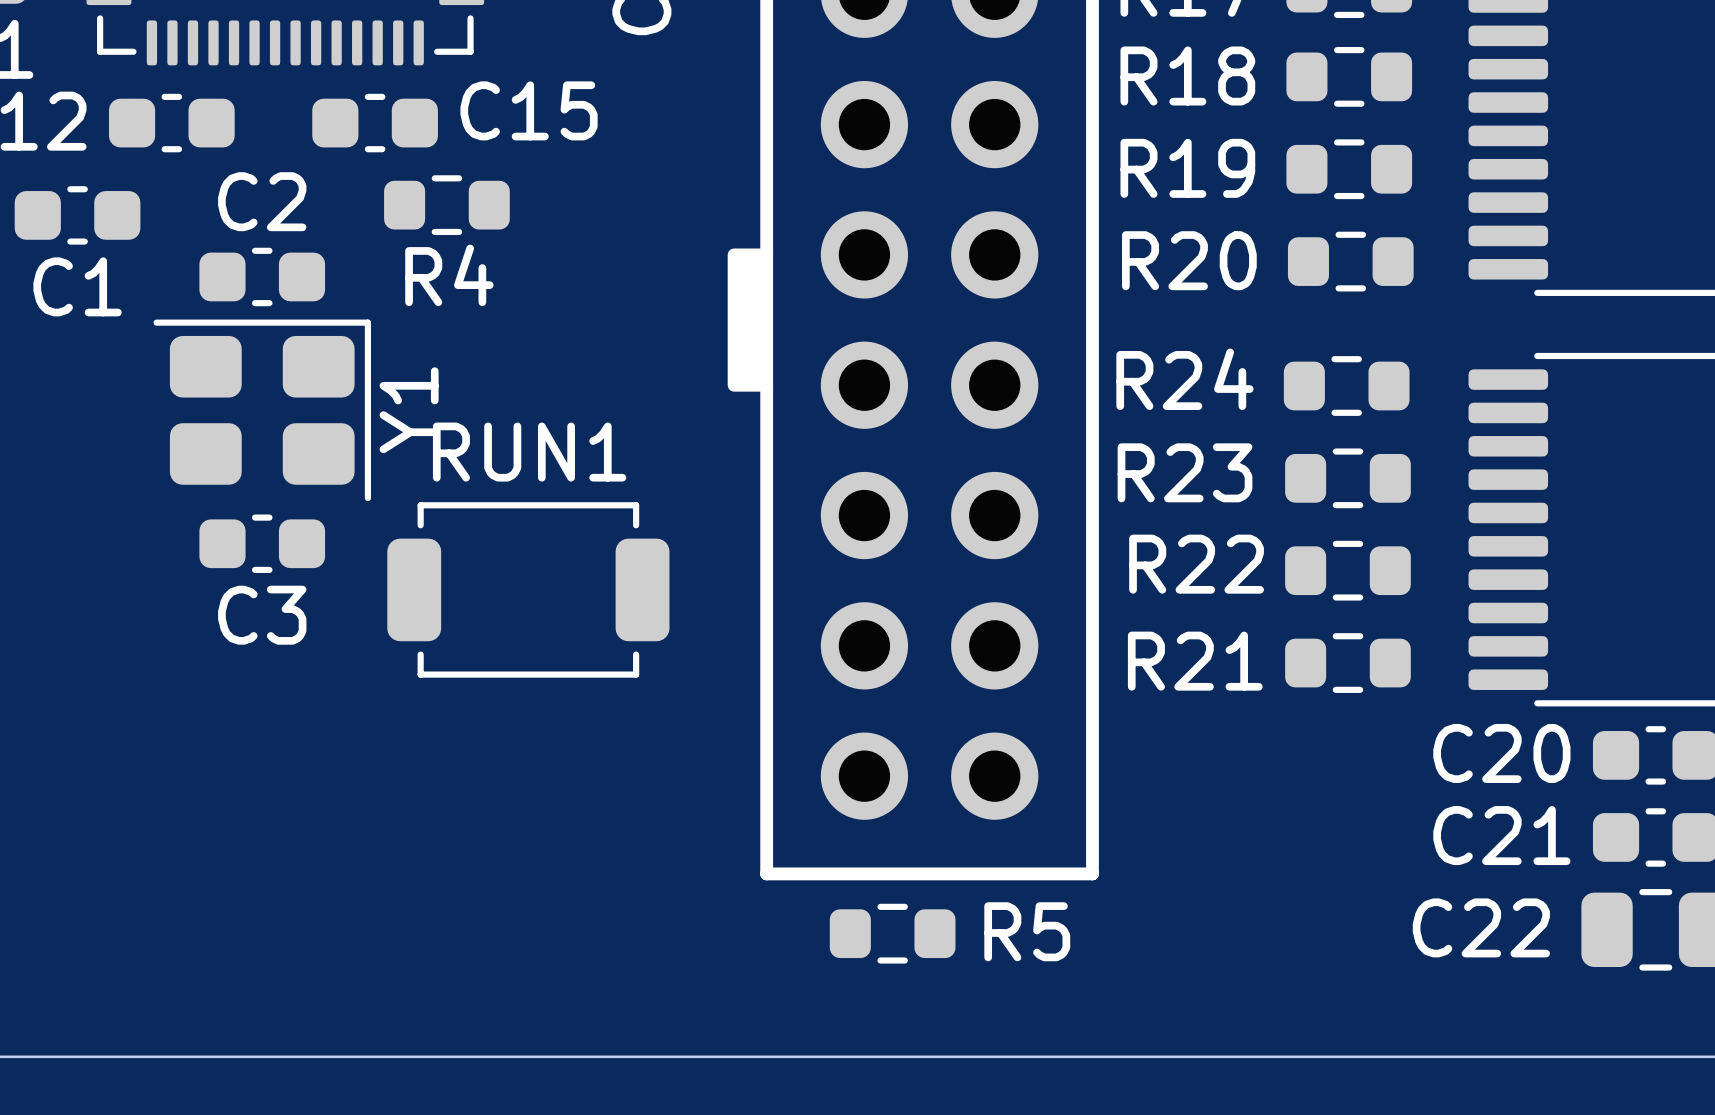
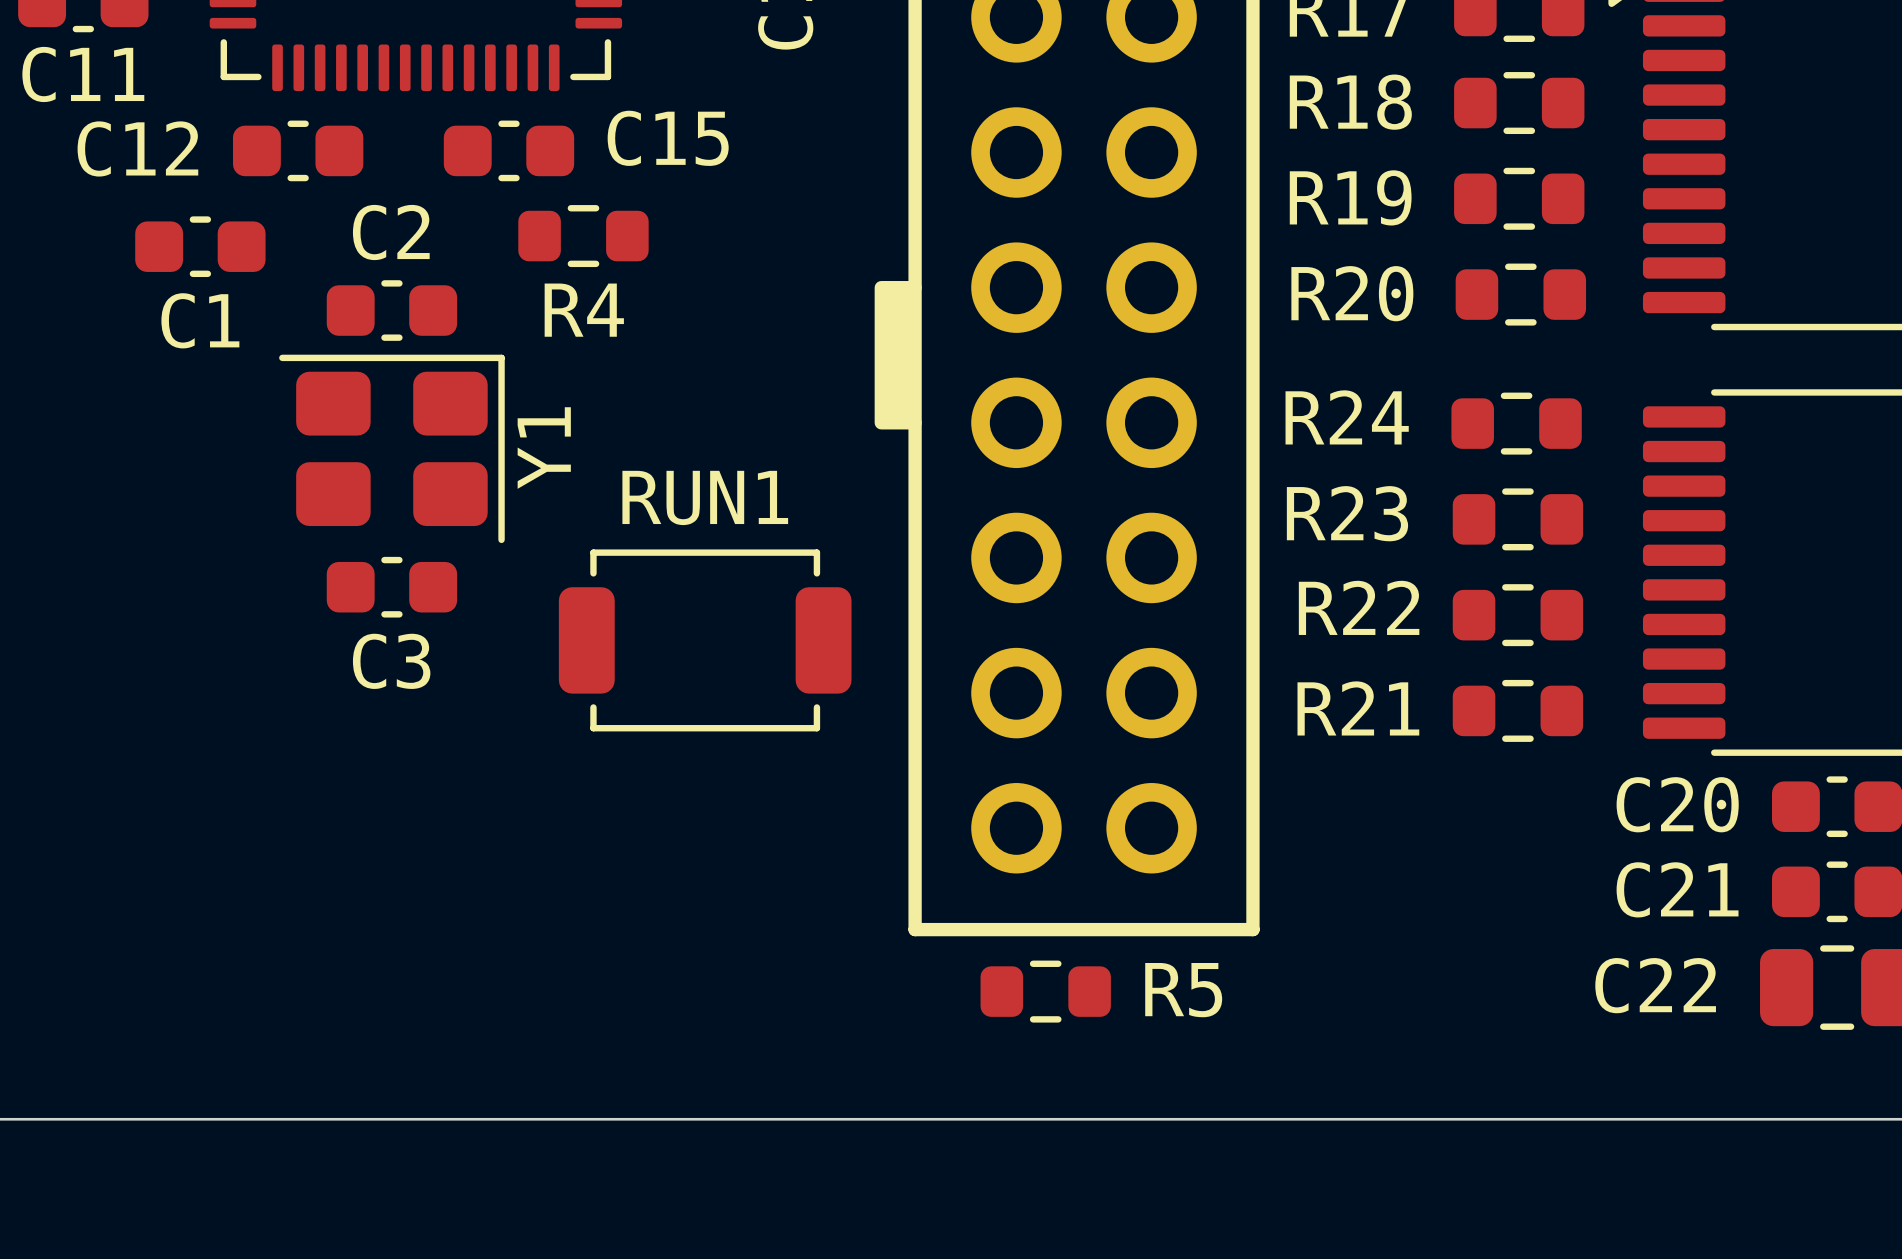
RUN1 position: (528, 589) -> (705, 640)

